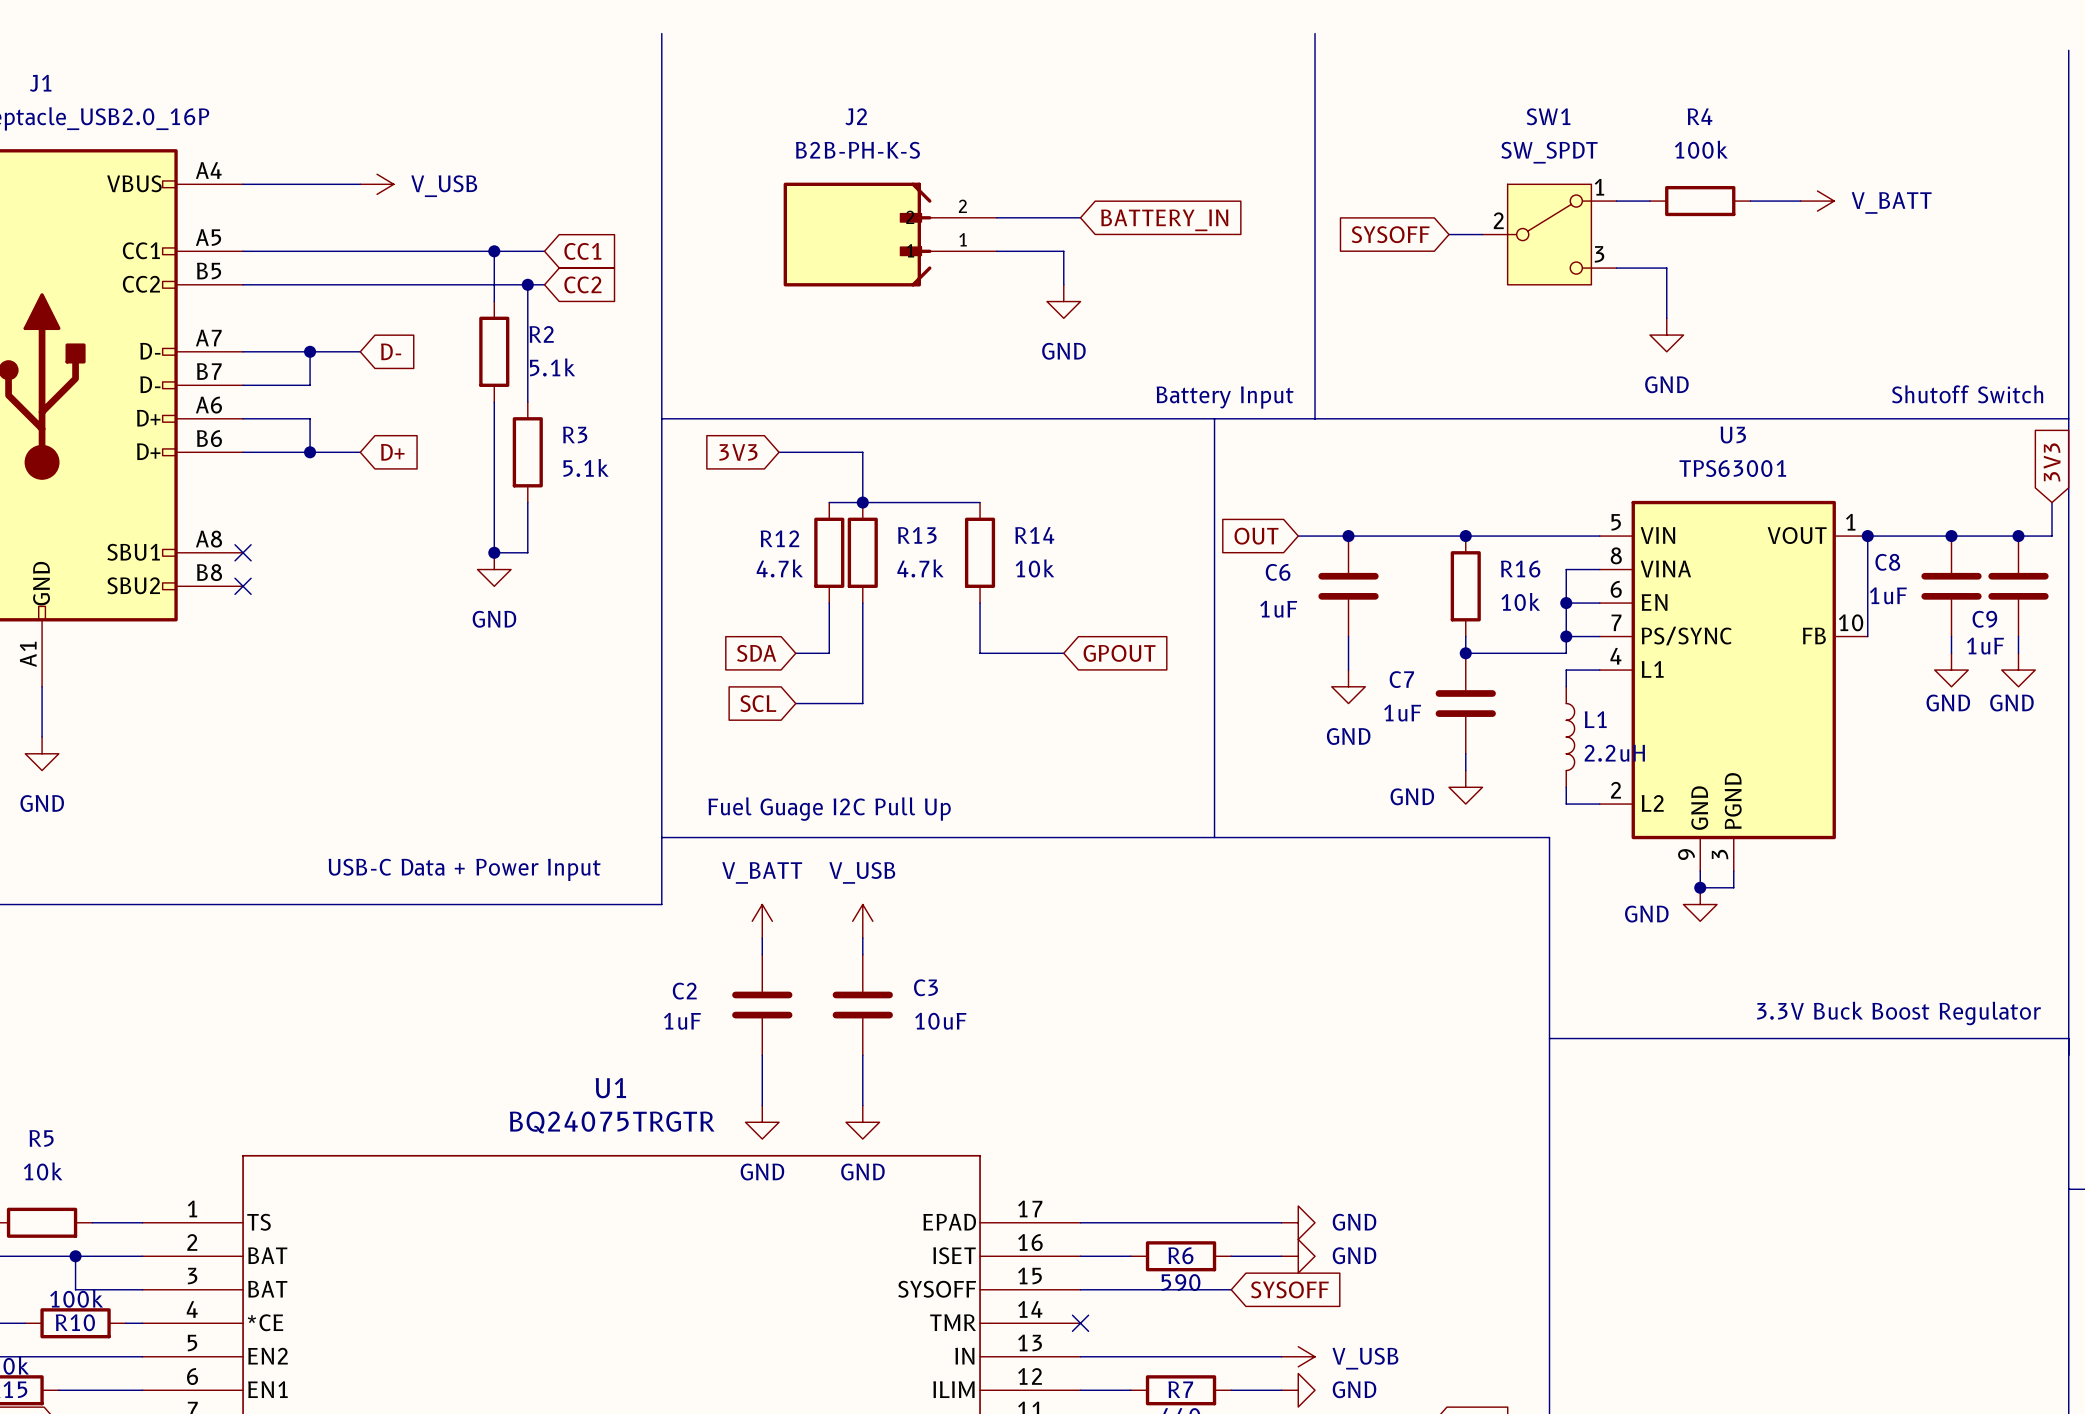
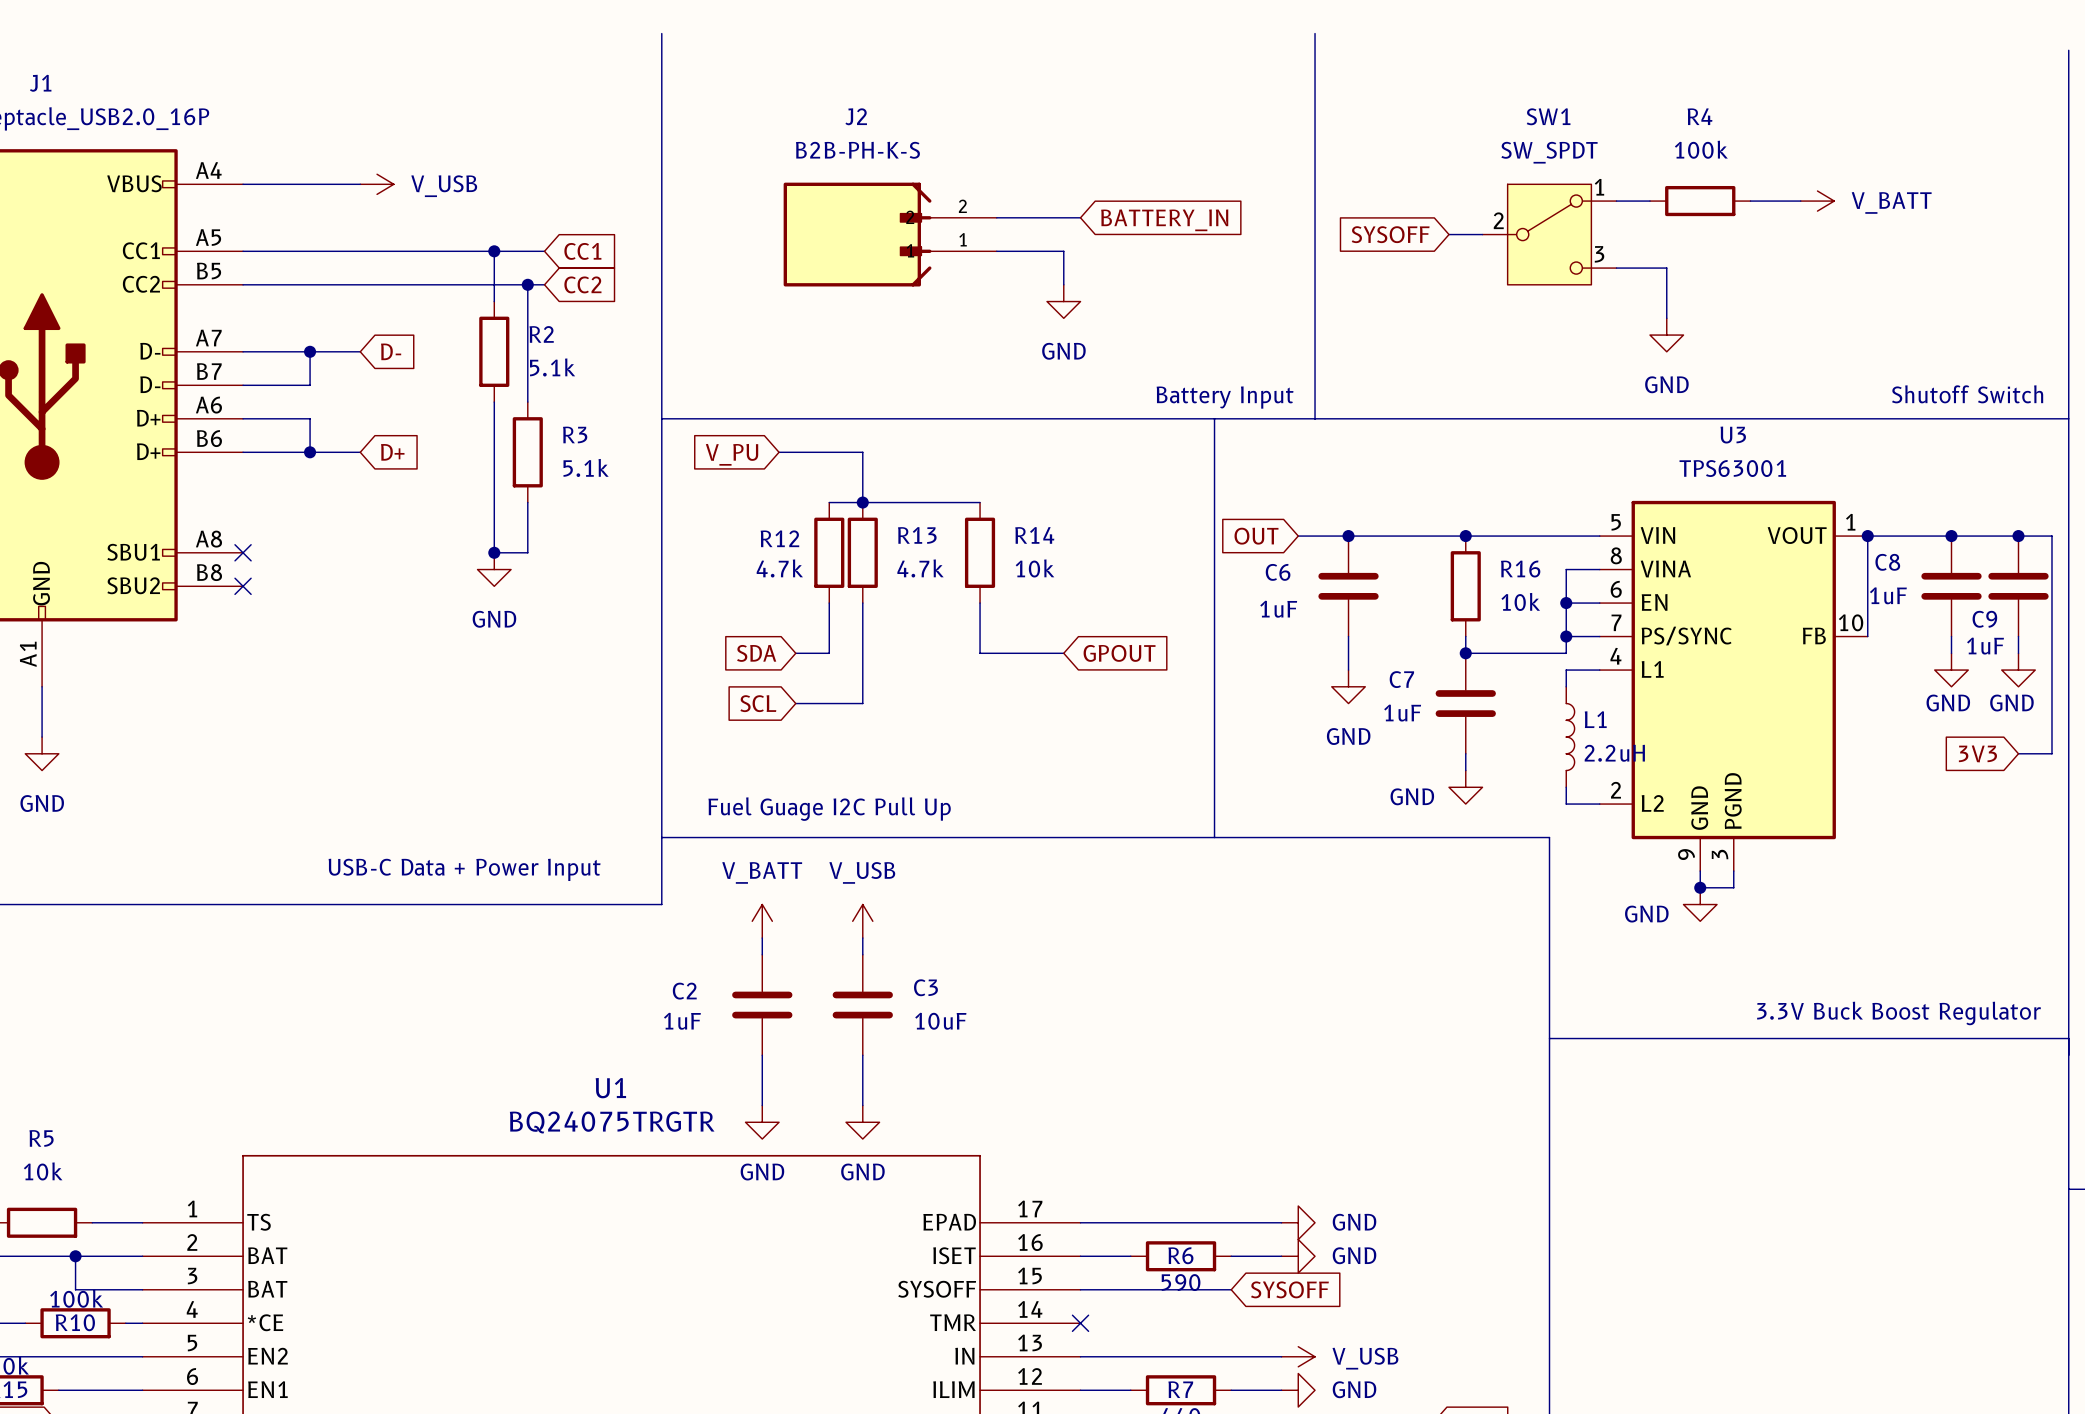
global label: 3V3 (738, 452) -> V_PU (732, 454)
global label rotation: 0° (2052, 462) -> 90° counterclockwise (1977, 753)
global label position: 3V3 (2052, 462) -> 3V3 (1977, 753)
wire: (2051, 502) (2051, 536) -> (2018, 753) (2051, 753) (2051, 536)

